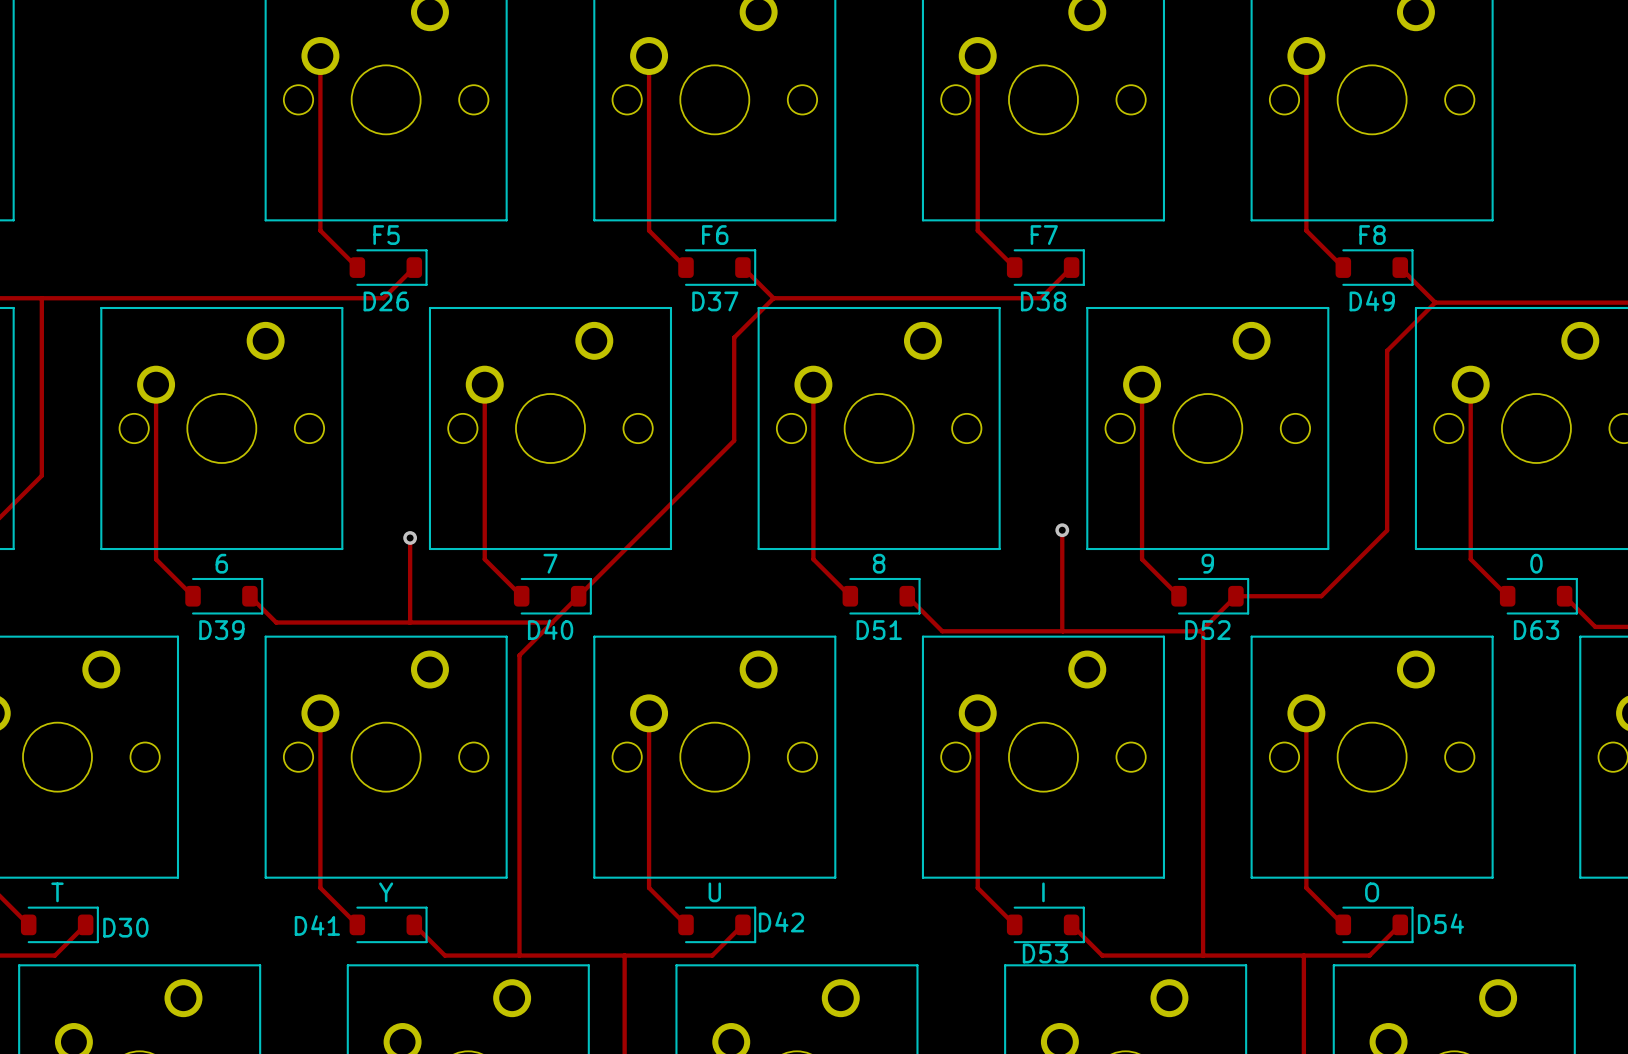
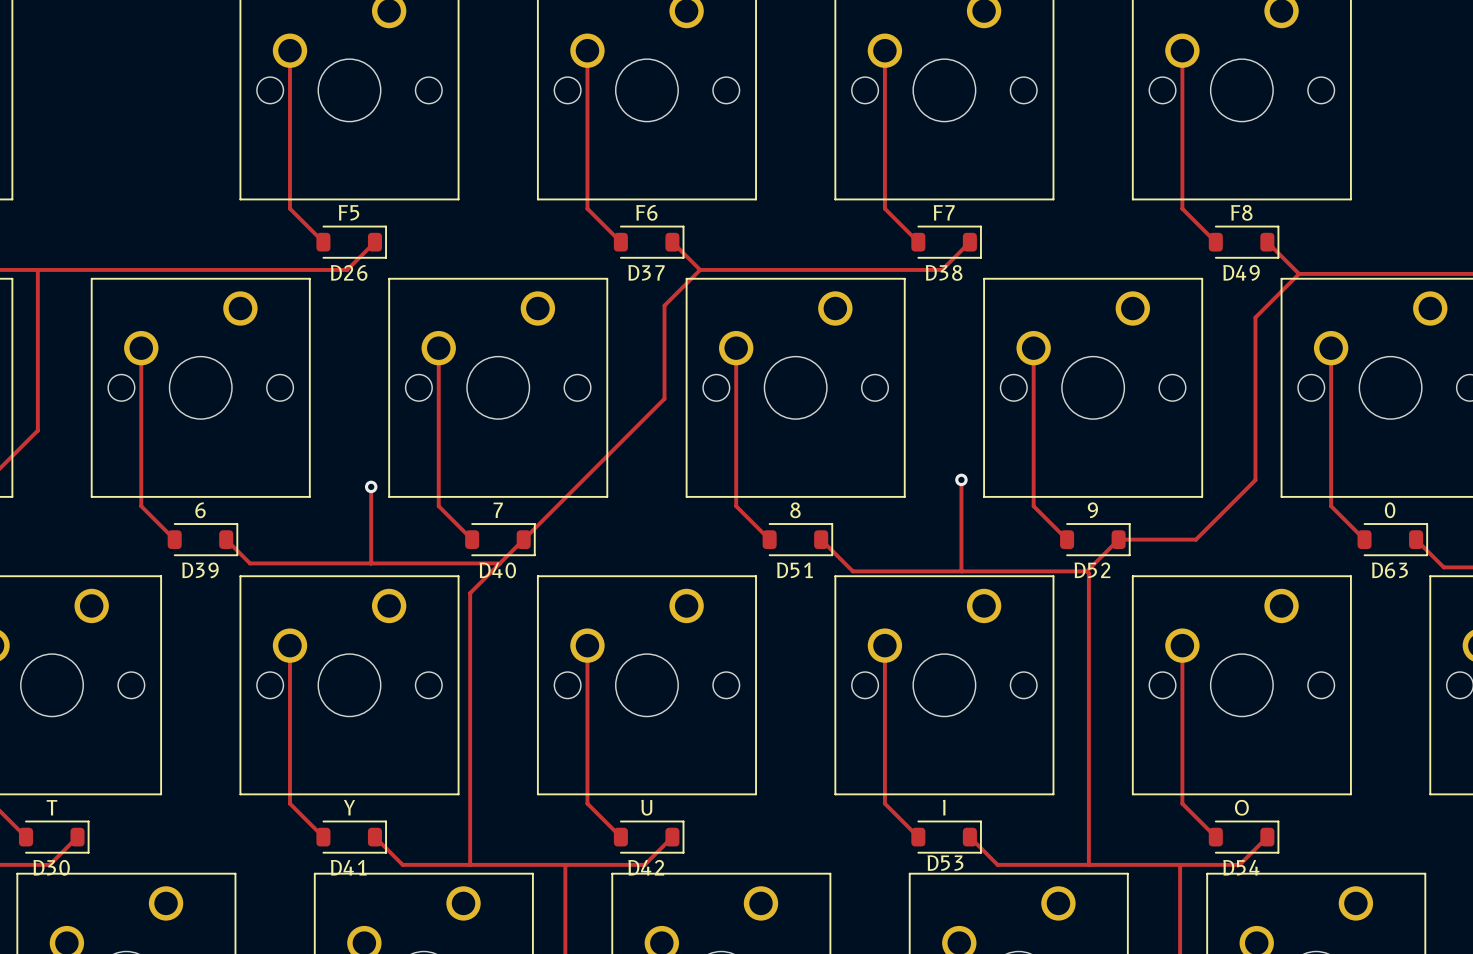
D42 name position: D42 (781, 922) -> D42 (646, 867)
D54 name position: D54 (1440, 923) -> D54 (1241, 867)
D41 name position: D41 (317, 925) -> D41 (348, 867)
D30 name position: D30 (125, 927) -> D30 (51, 867)

